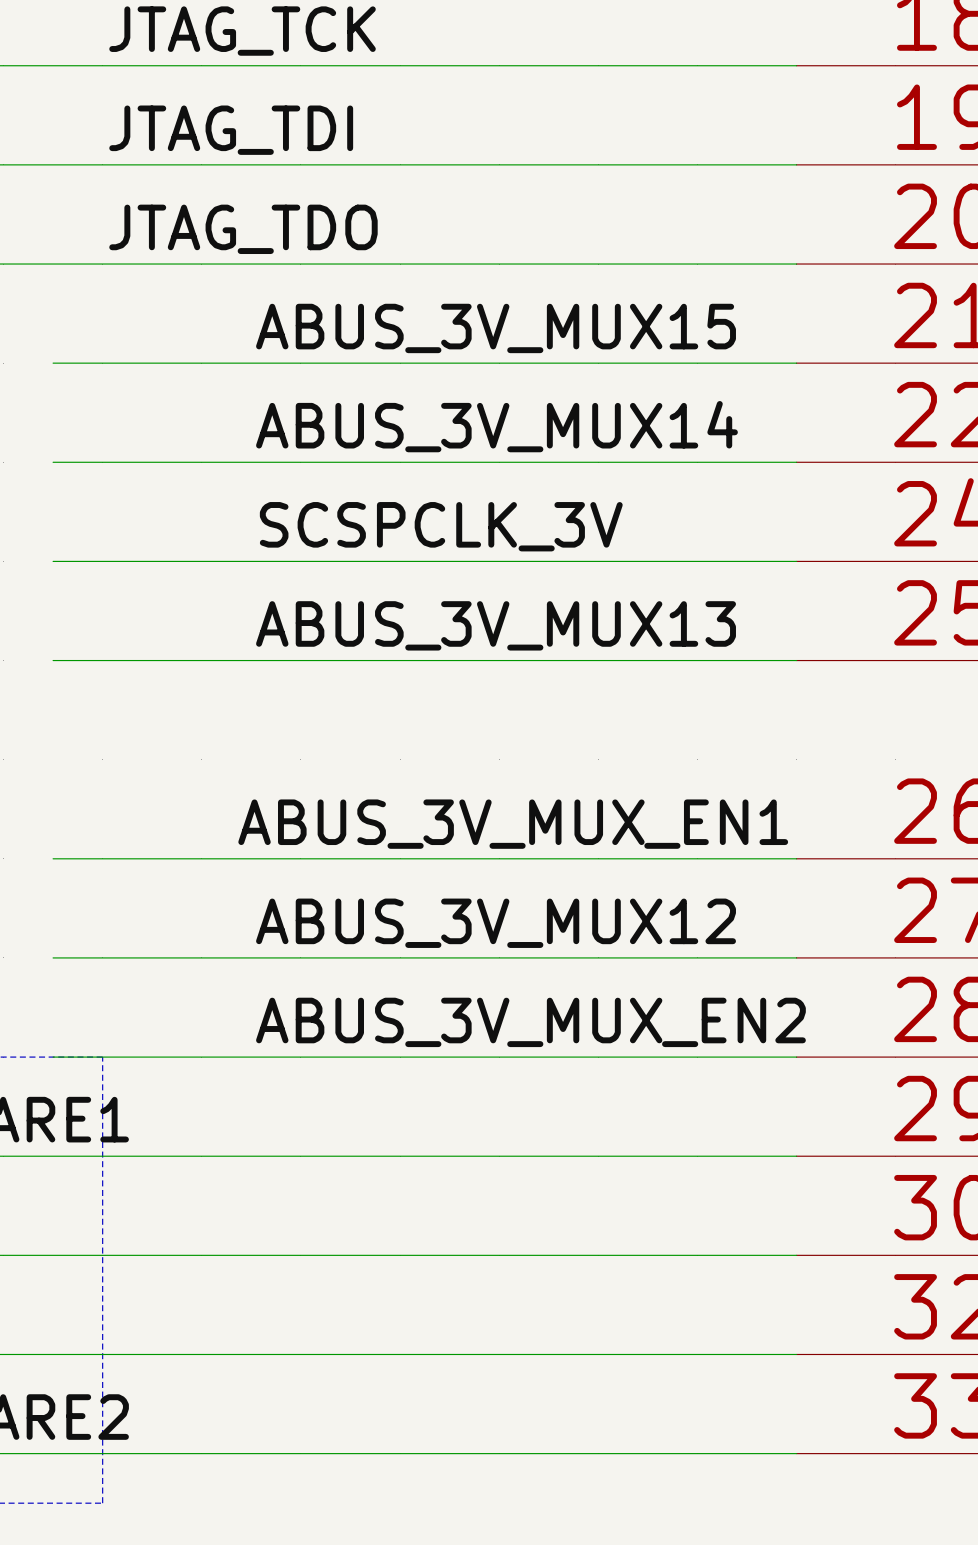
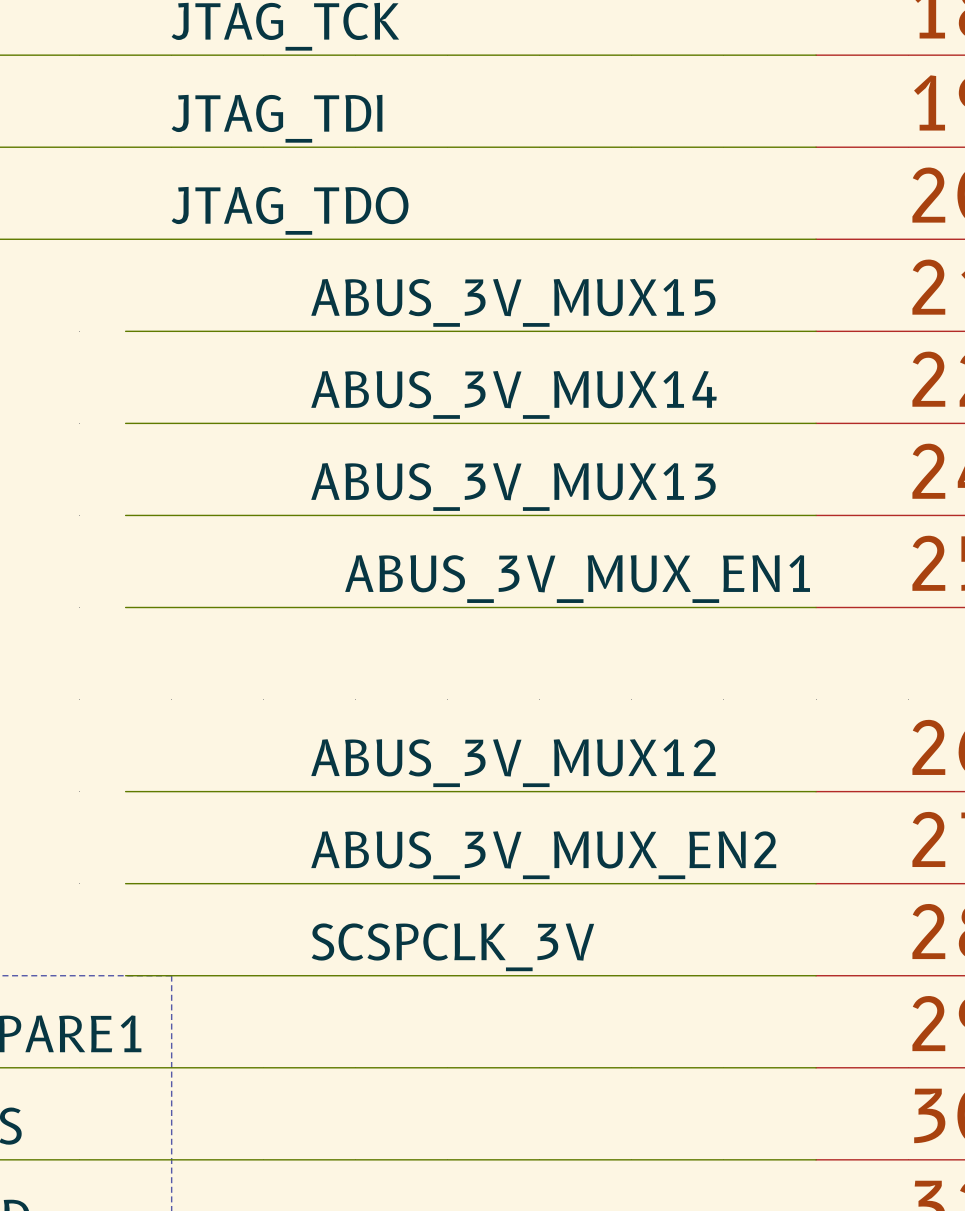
label: SCSPCLK_3V (441, 526) -> ABUS_3V_MUX13 (513, 486)
label: ABUS_3V_MUX13 (496, 625) -> none
label: none -> ABUS_3V_MUX12 (513, 763)
label position: ABUS_3V_MUX_EN1 (513, 824) -> ABUS_3V_MUX_EN1 (577, 579)
label: ABUS_3V_MUX12 (496, 923) -> ABUS_3V_MUX_EN2 (543, 855)
label: ABUS_3V_MUX_EN2 (530, 1022) -> SCSPCLK_3V (452, 947)

